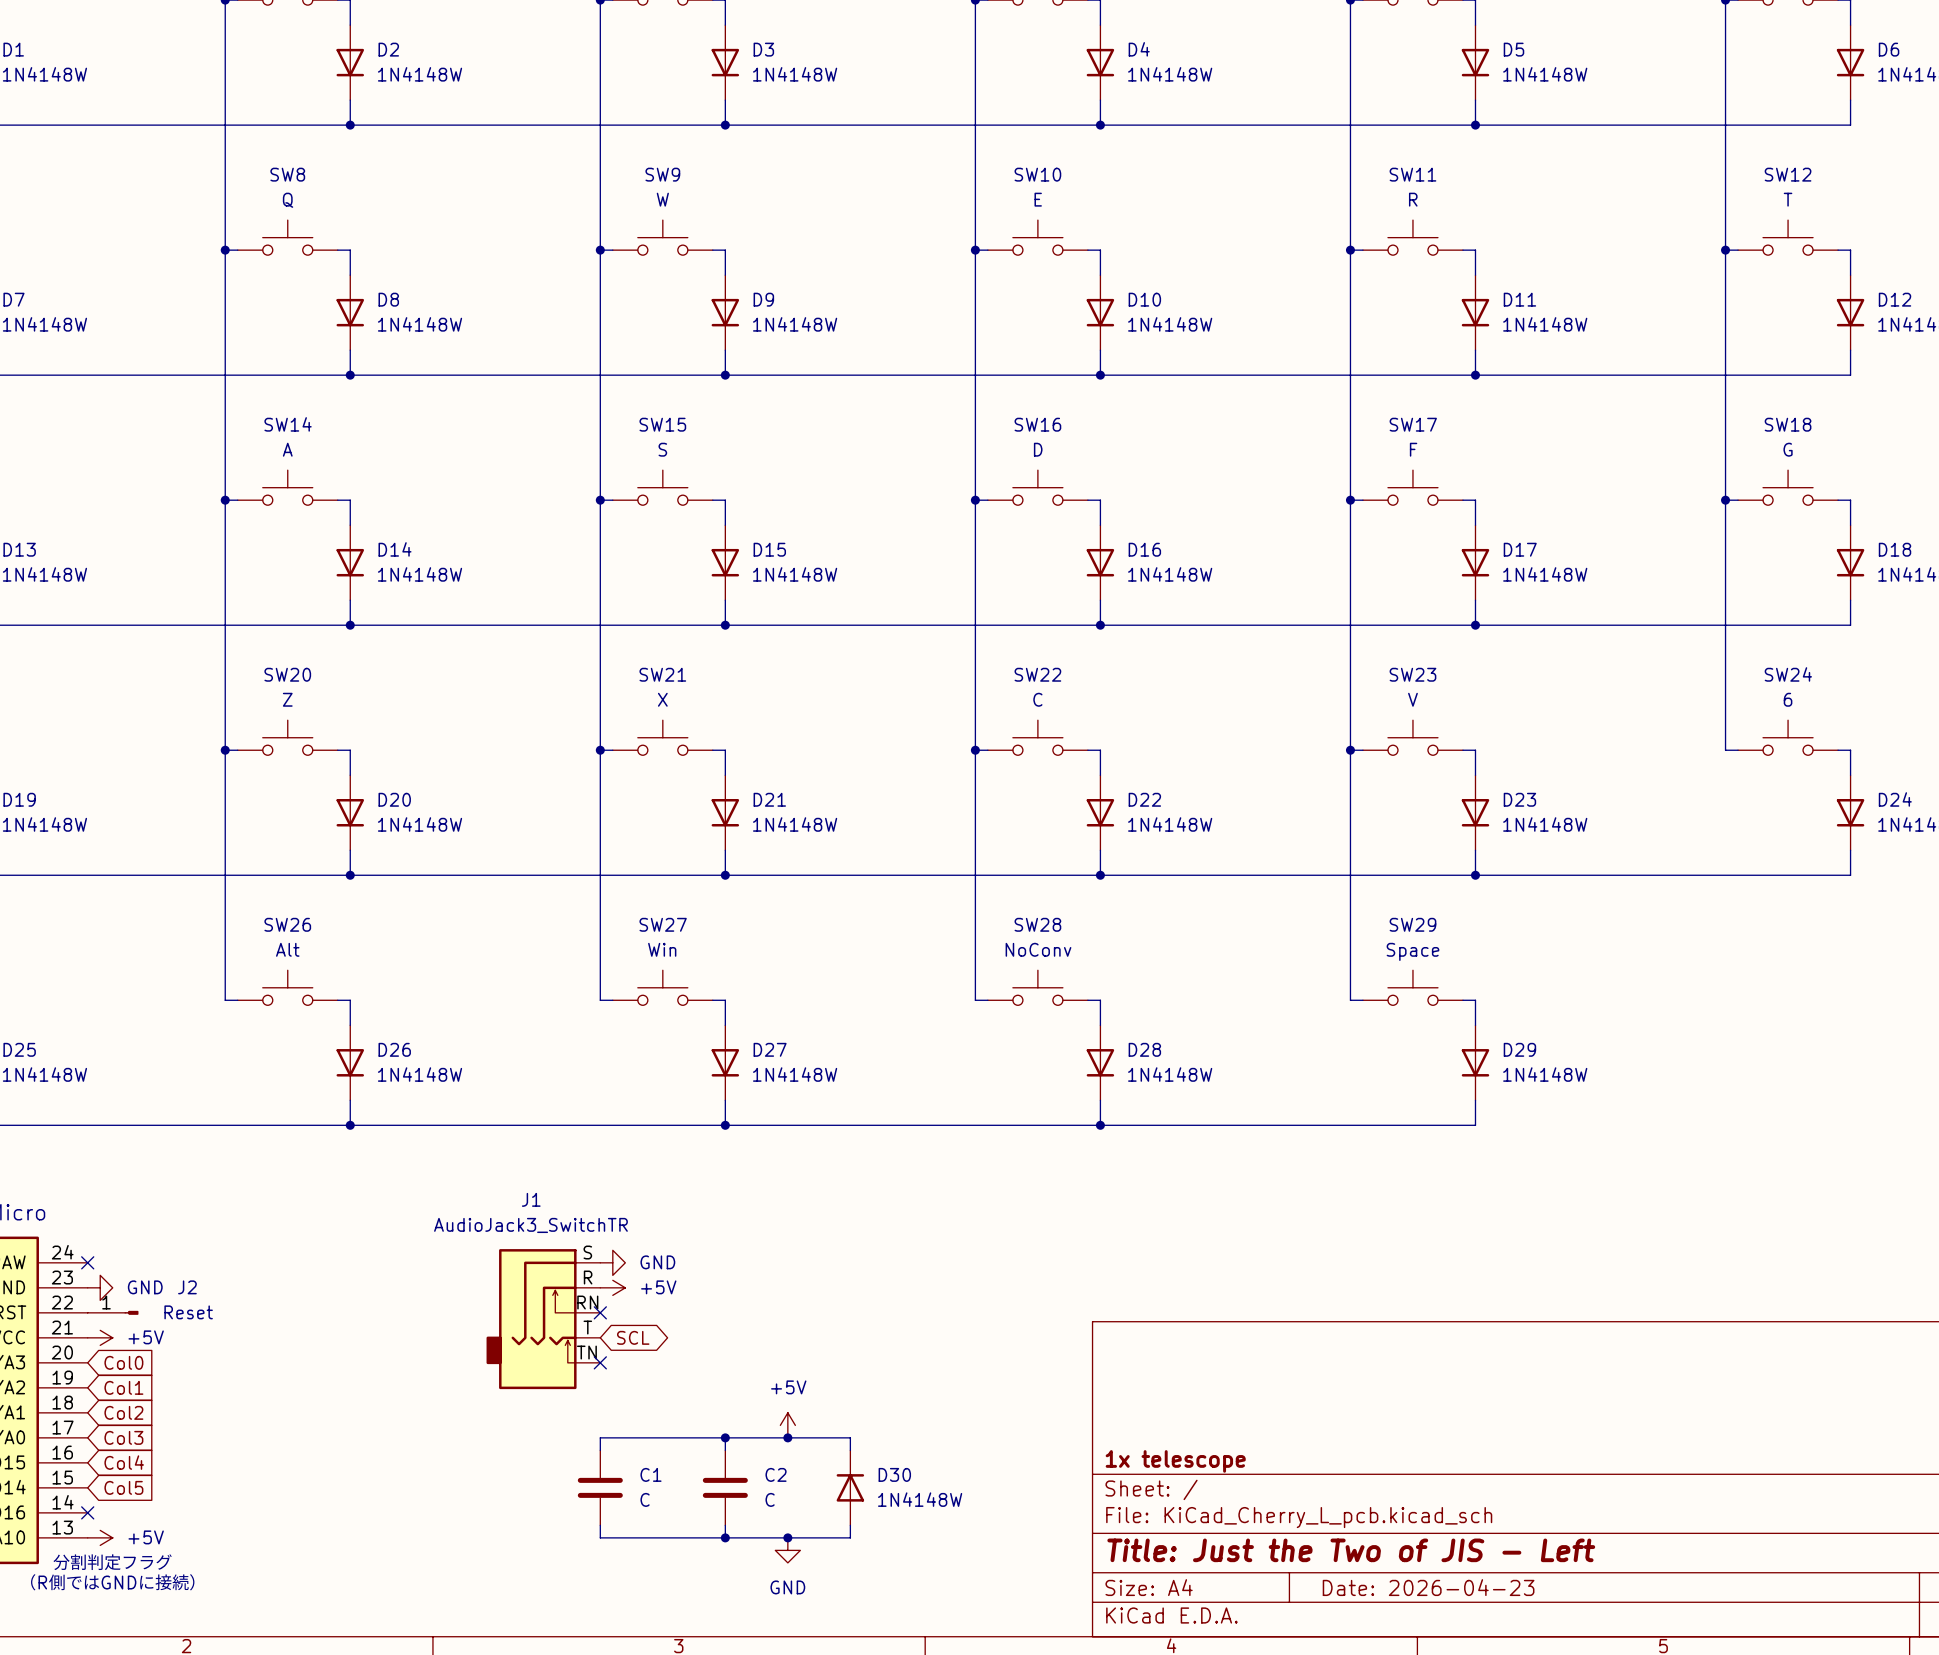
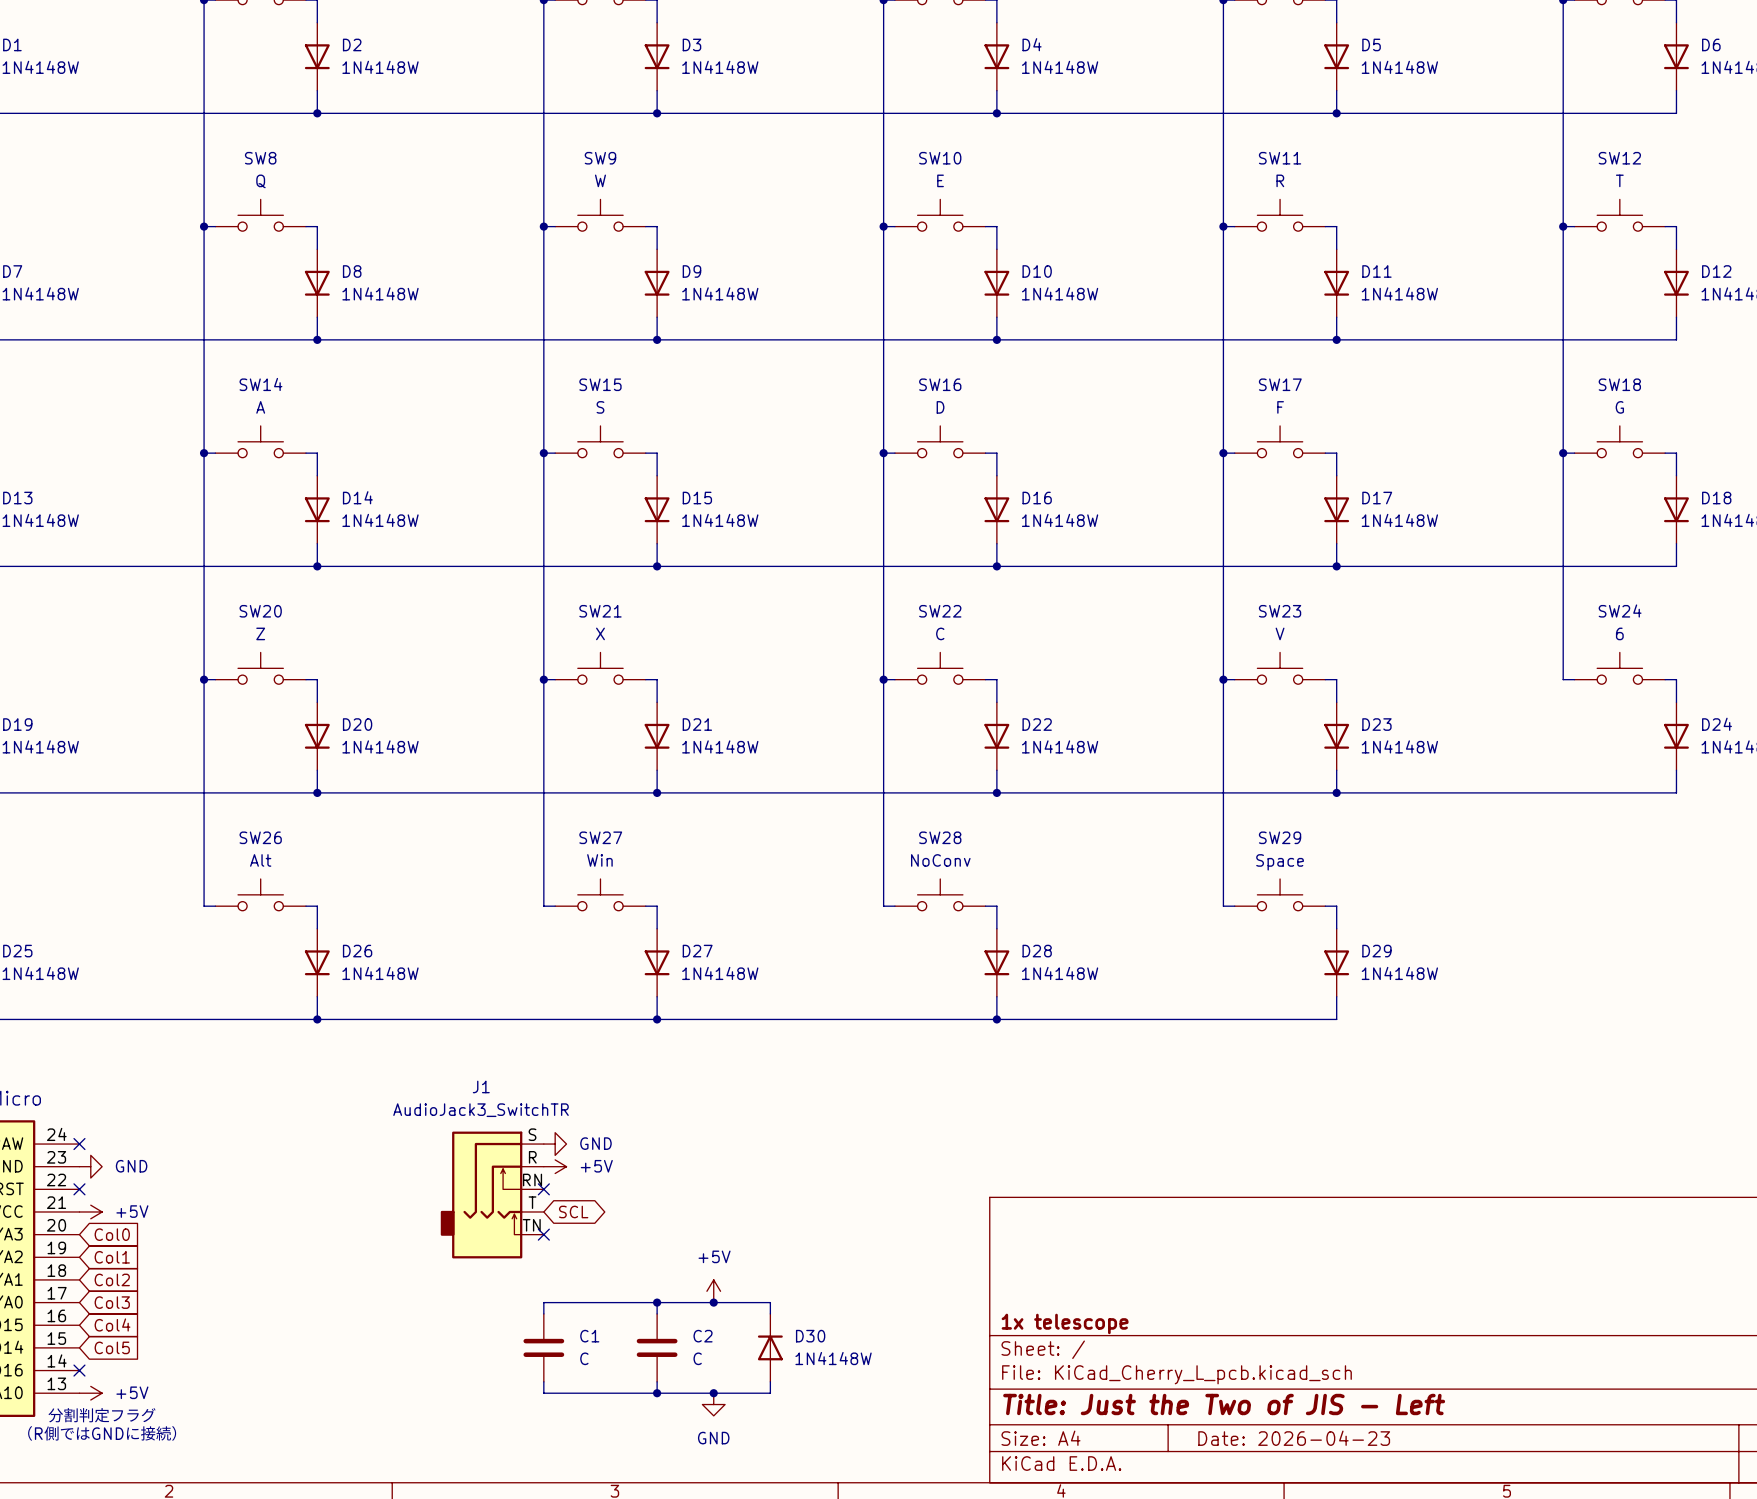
no-connect mark: none -> (79, 1189)
J2: Reset (113, 1312) -> none

